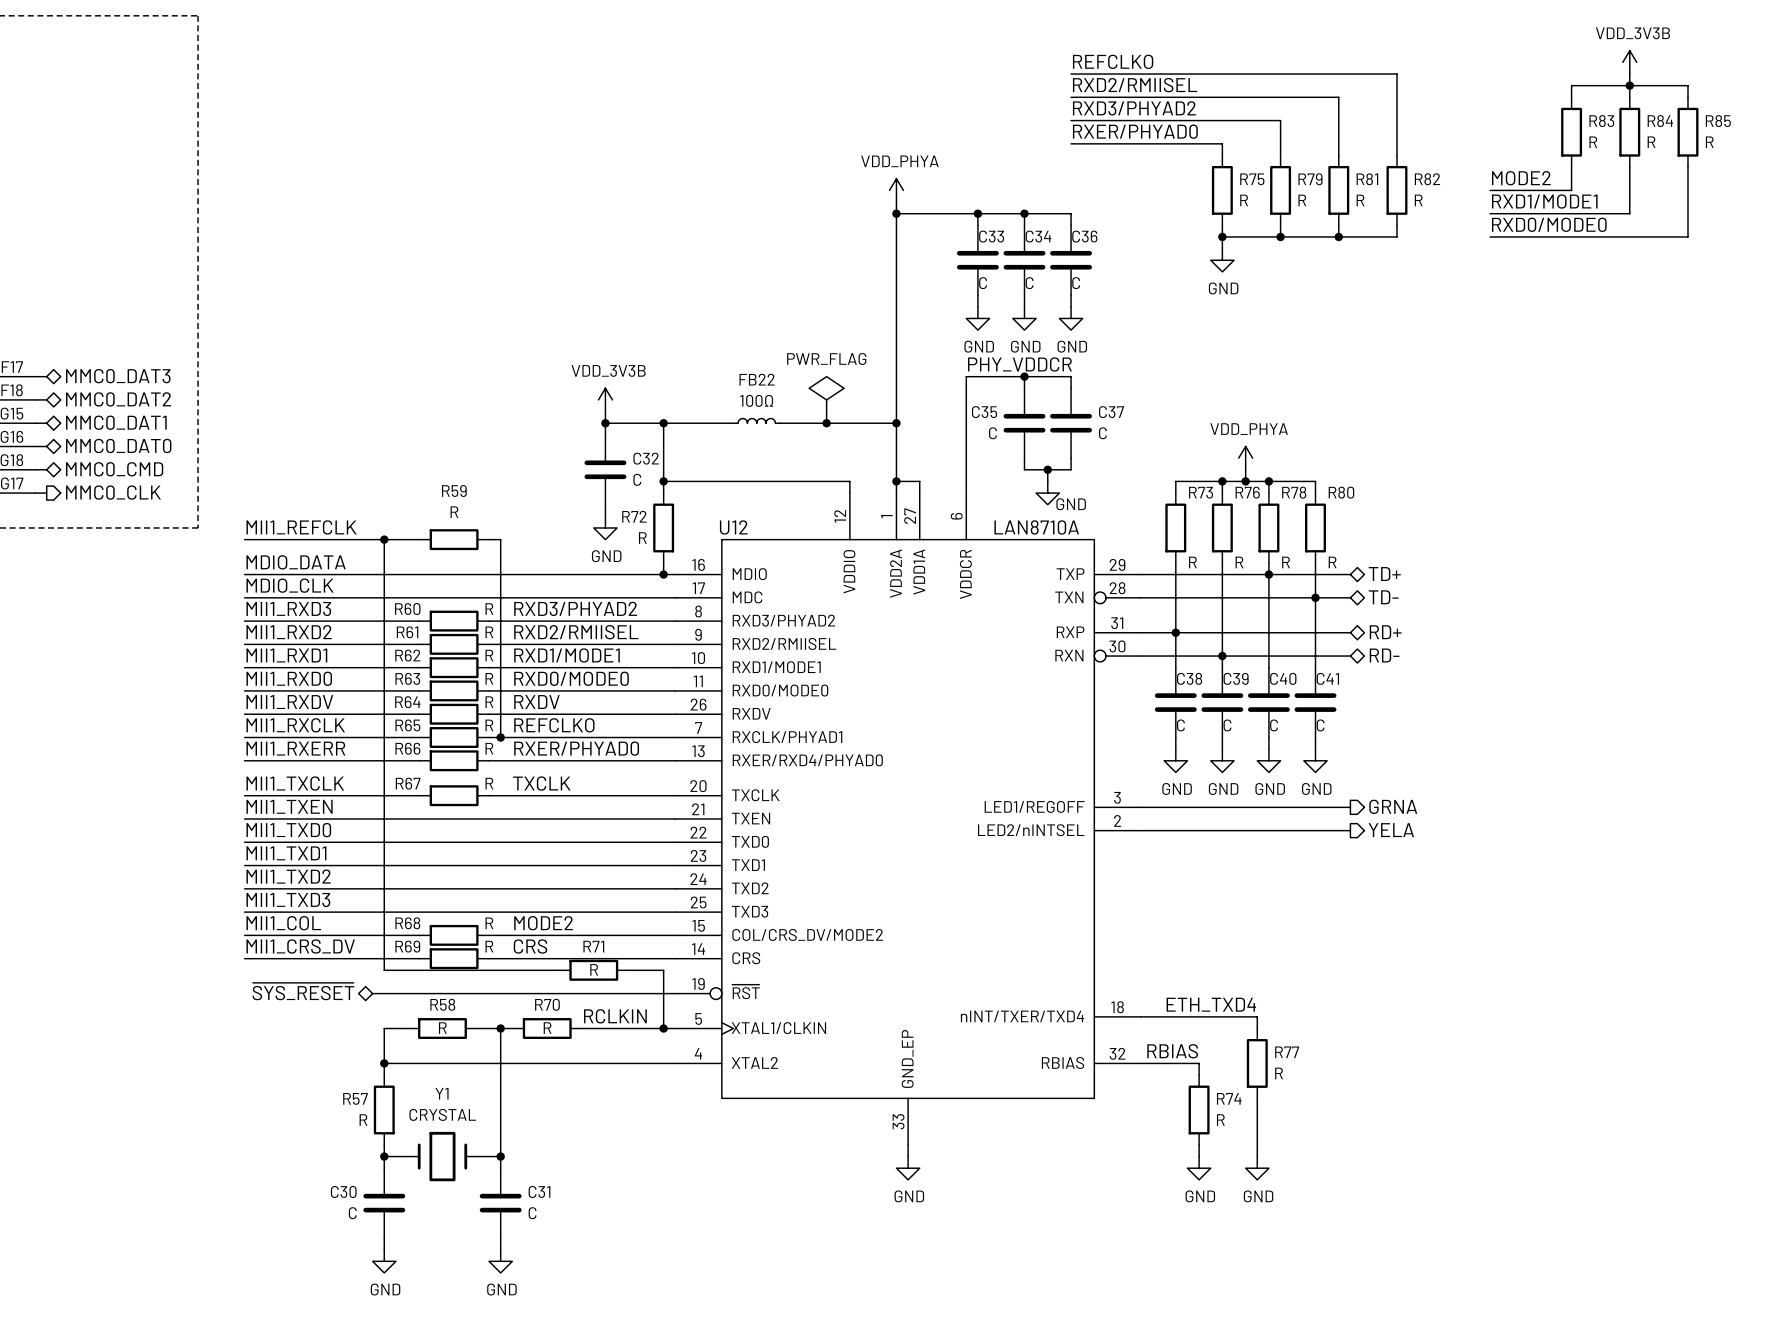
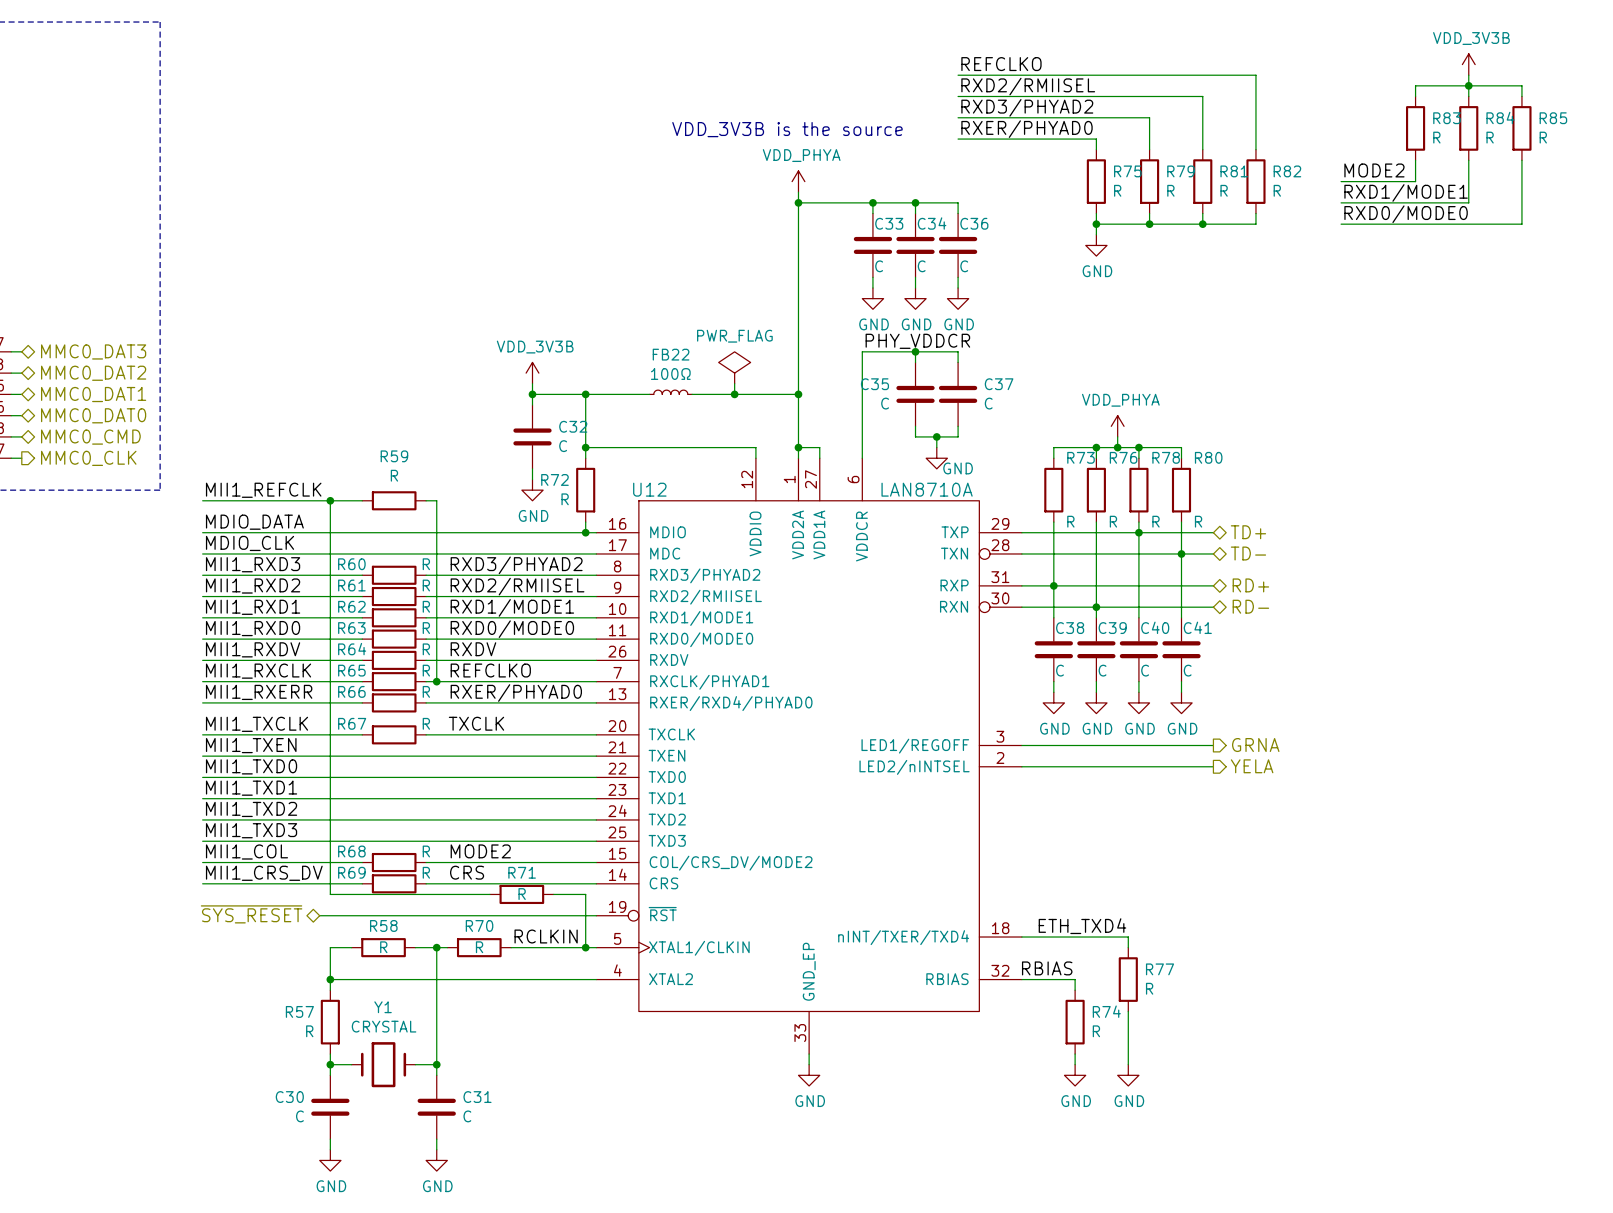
text: none -> VDD_3V3B is the source (787, 129)

